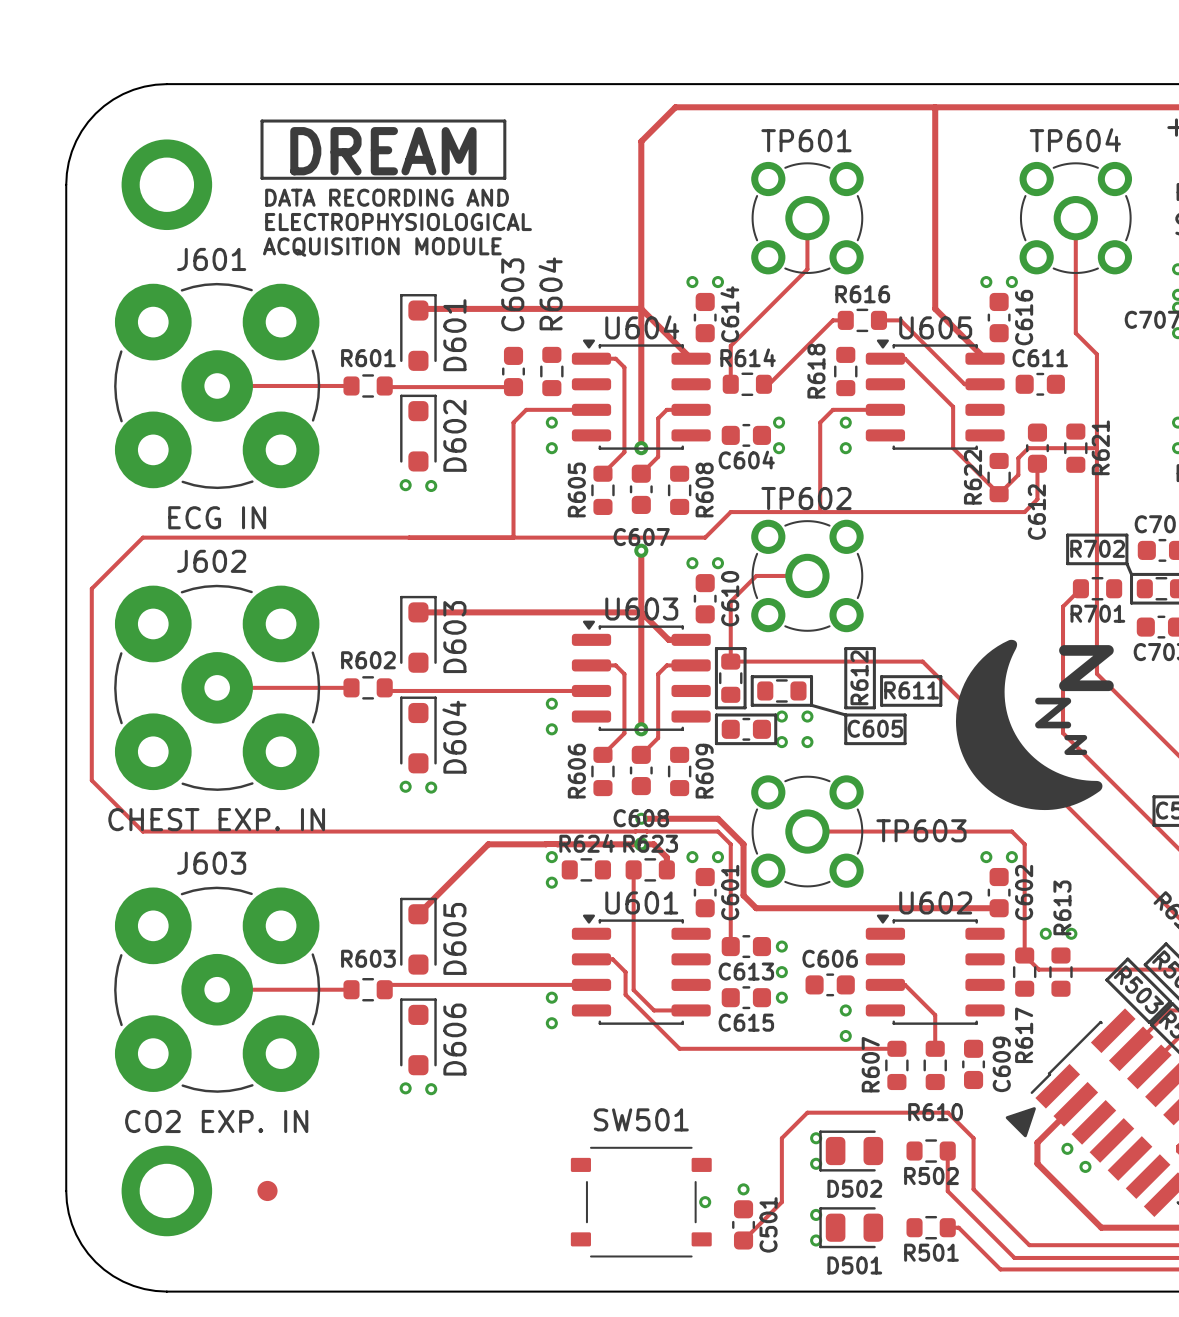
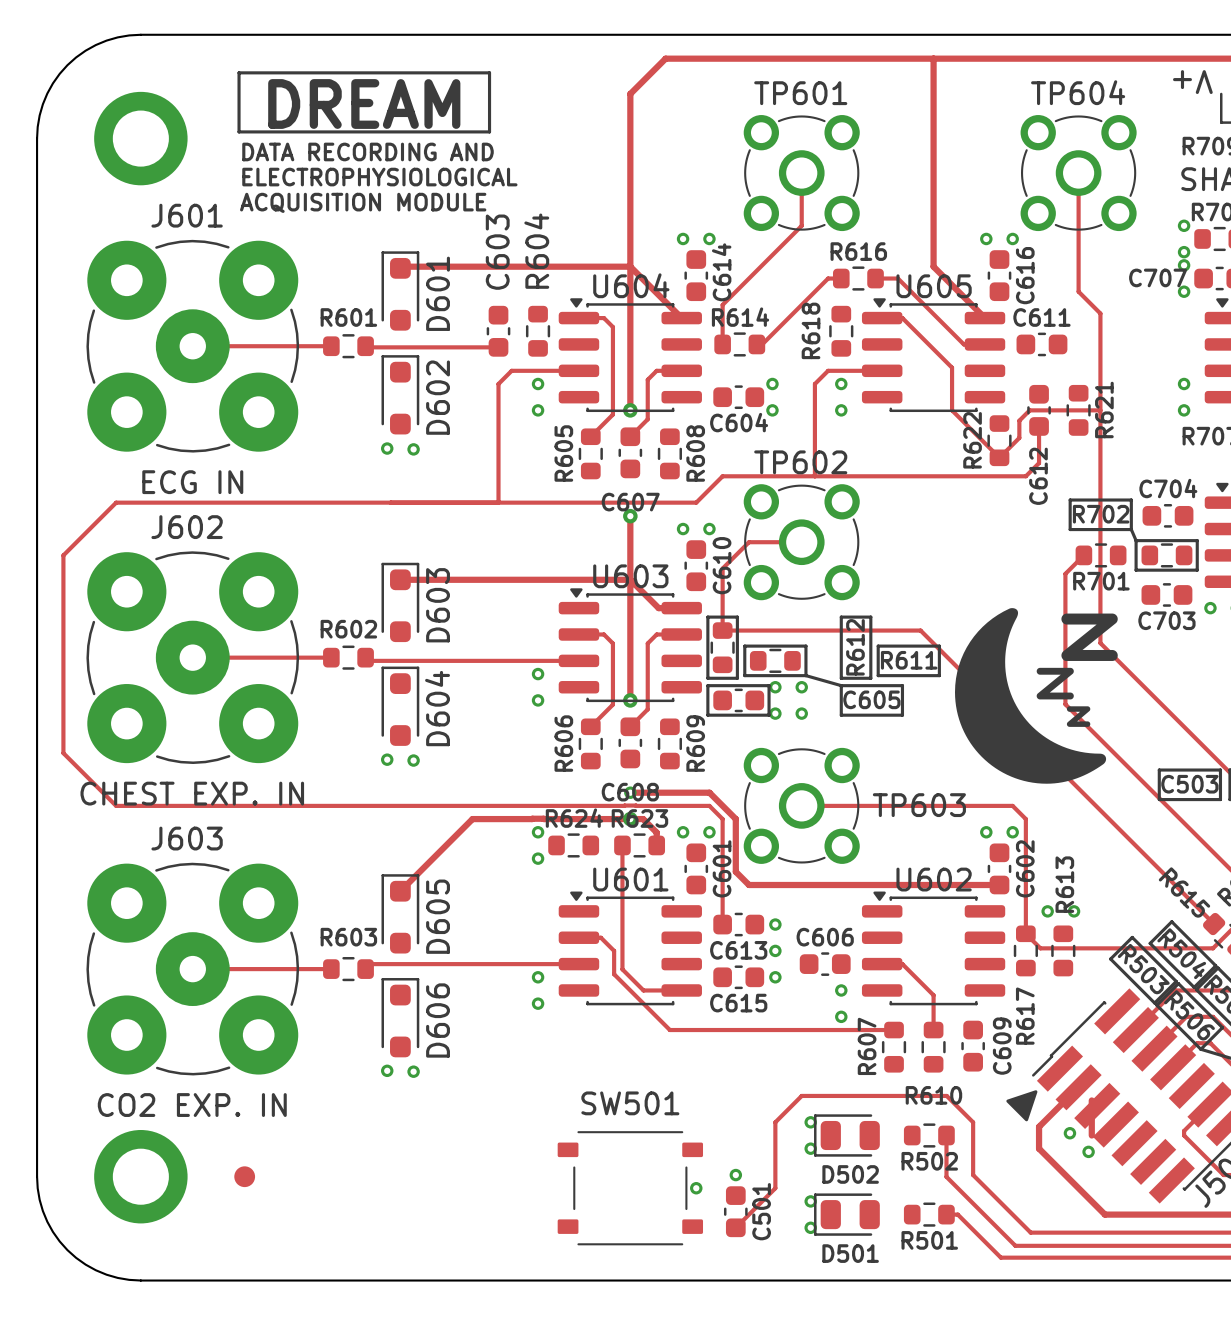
track: none -> (1091, 1100) (1091, 1135)

